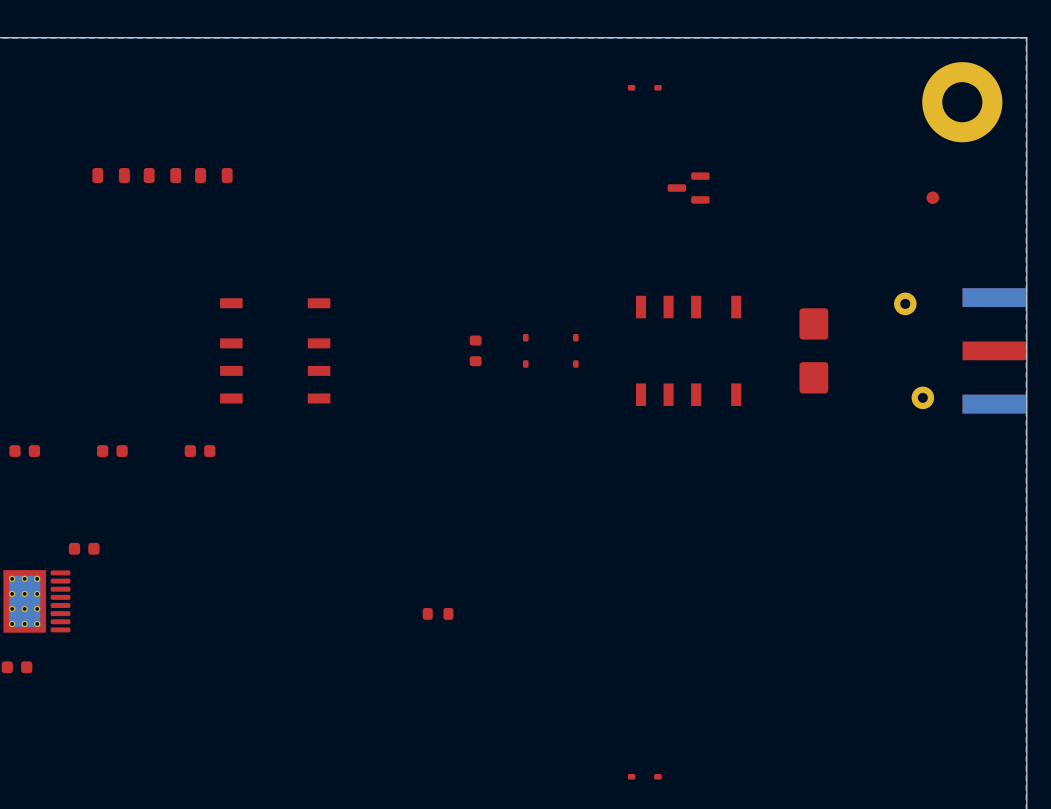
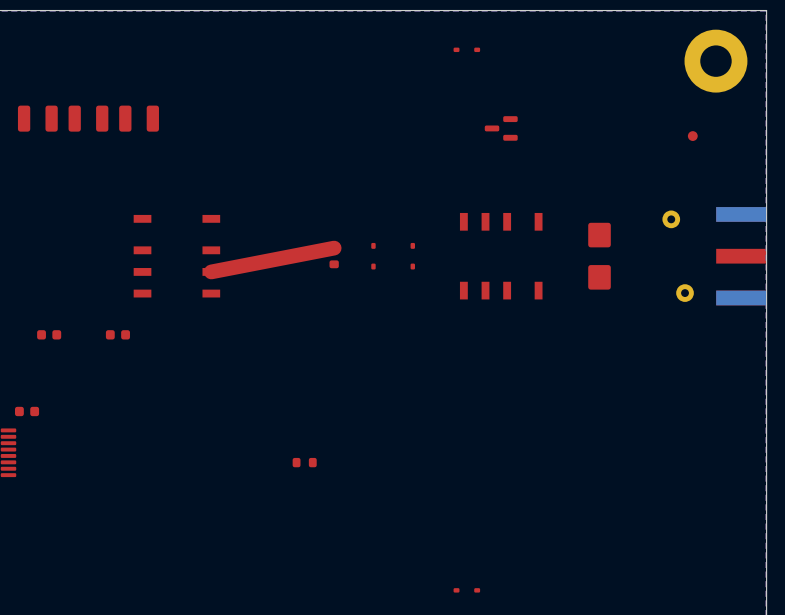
part footprint: [143, 167, 182, 184] -> [68, 105, 109, 132]
part: none -> (37, 118)
part: (111, 175) -> none
part: (213, 175) -> none
part: none -> (139, 118)
top track: none -> (334, 248) (211, 271)

